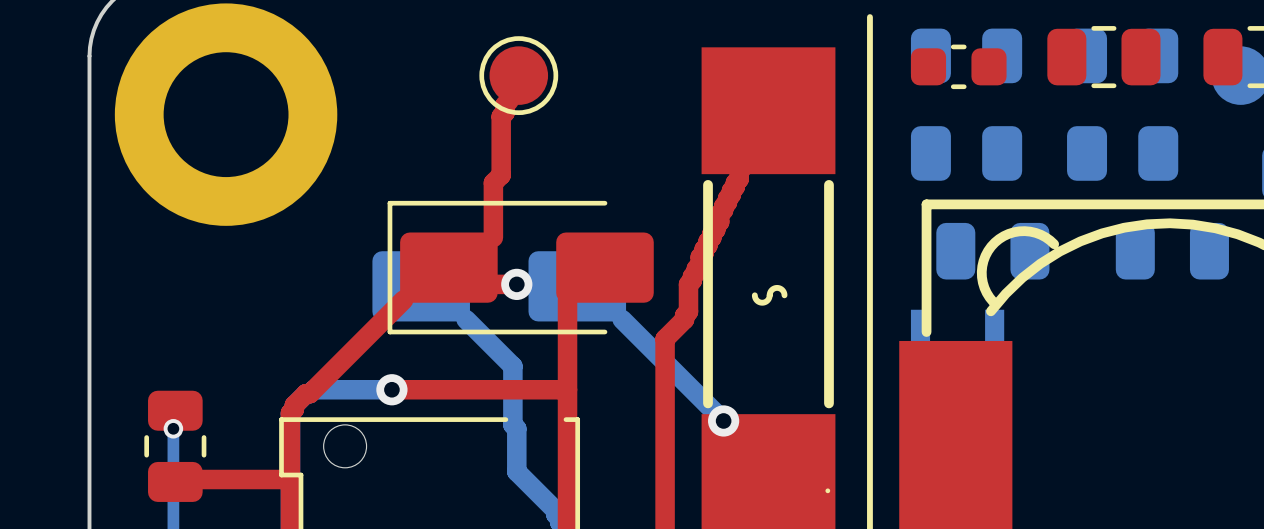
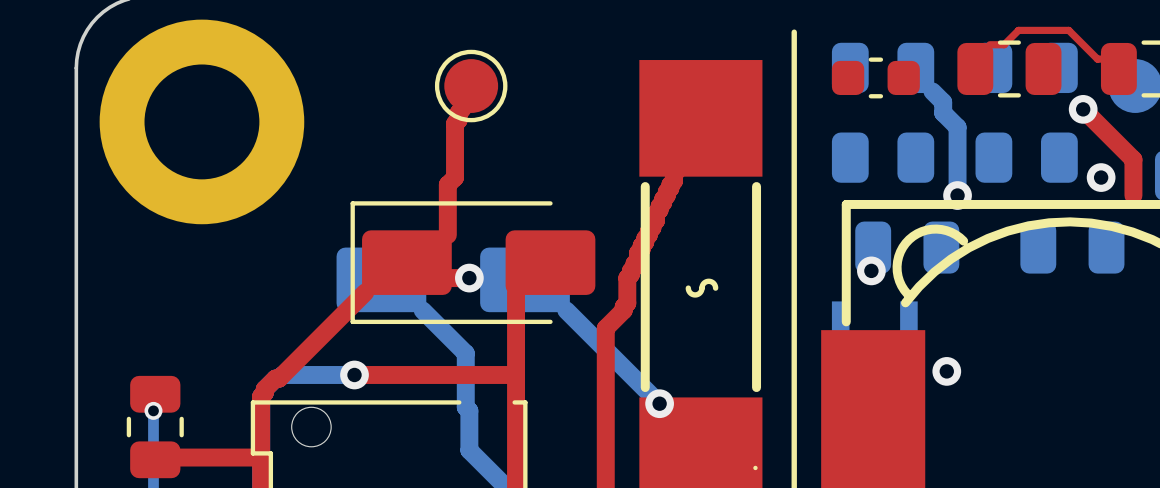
top track: none -> (989, 44) (1004, 44) (1018, 30) (1068, 30) (1097, 59) (1101, 59)
bottom track: none -> (932, 91) (943, 102) (943, 112) (957, 127) (957, 195)
top track: none -> (1083, 109) (1133, 159) (1133, 195)
via: none -> (1083, 109)
via: none -> (1101, 177)
via: none -> (957, 195)
via: none -> (871, 270)
via: none -> (946, 371)

